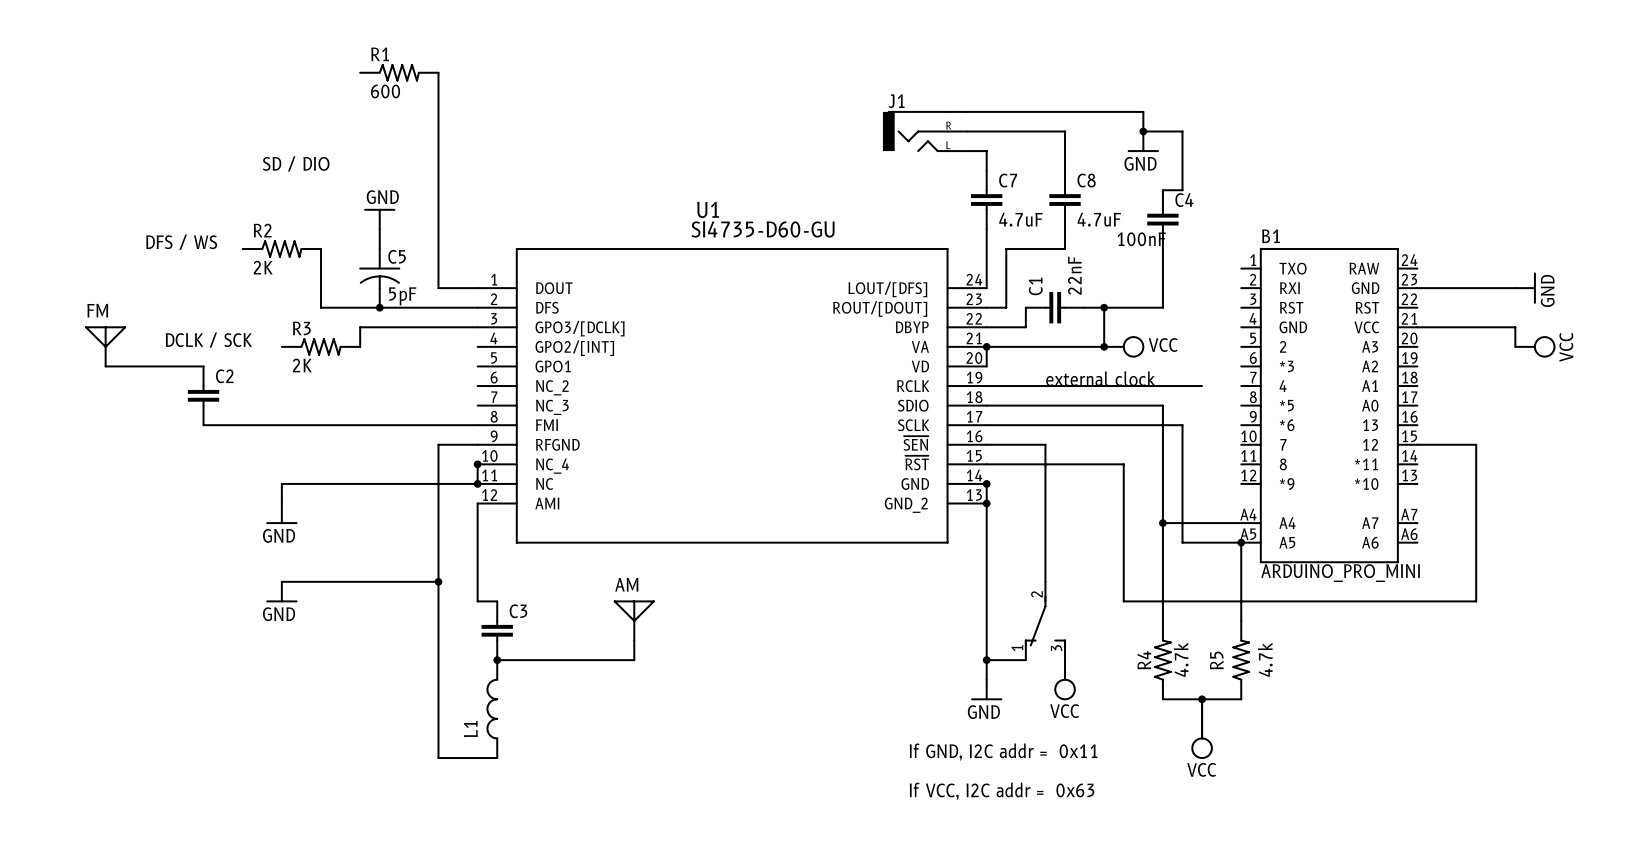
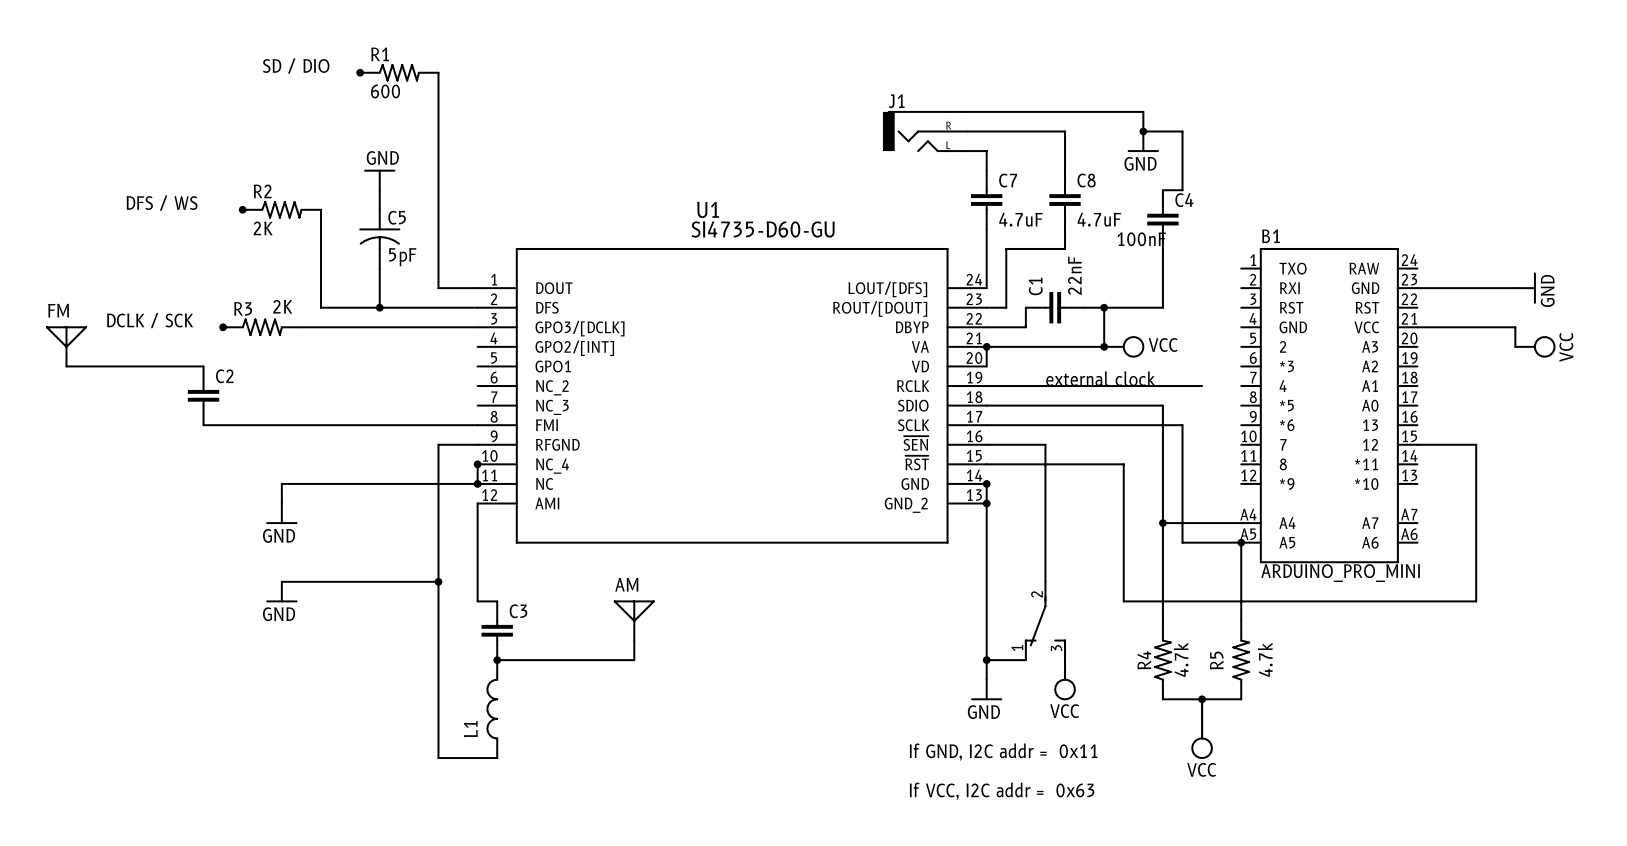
junction: none -> (360, 72)
text position: SD / DIO (296, 163) -> SD / DIO (296, 65)
junction: none -> (242, 209)
wire: none -> (321, 209) (321, 248)
power symbol position: GND (379, 219) -> GND (379, 179)
text position: DFS / WS (181, 242) -> DFS / WS (162, 203)
R2 position: (281, 248) -> (281, 209)
C5 position: (379, 278) -> (379, 239)
junction: none -> (223, 327)
wire: (360, 327) (360, 346) -> (360, 327) (301, 327)
text position: DCLK / SCK (208, 340) -> DCLK / SCK (150, 320)
FM position: (105, 346) -> (66, 346)
R3 position: (321, 346) -> (262, 327)
R3 value position: 2K (302, 365) -> 2K (282, 306)
wire: none -> (66, 366) (105, 366)

